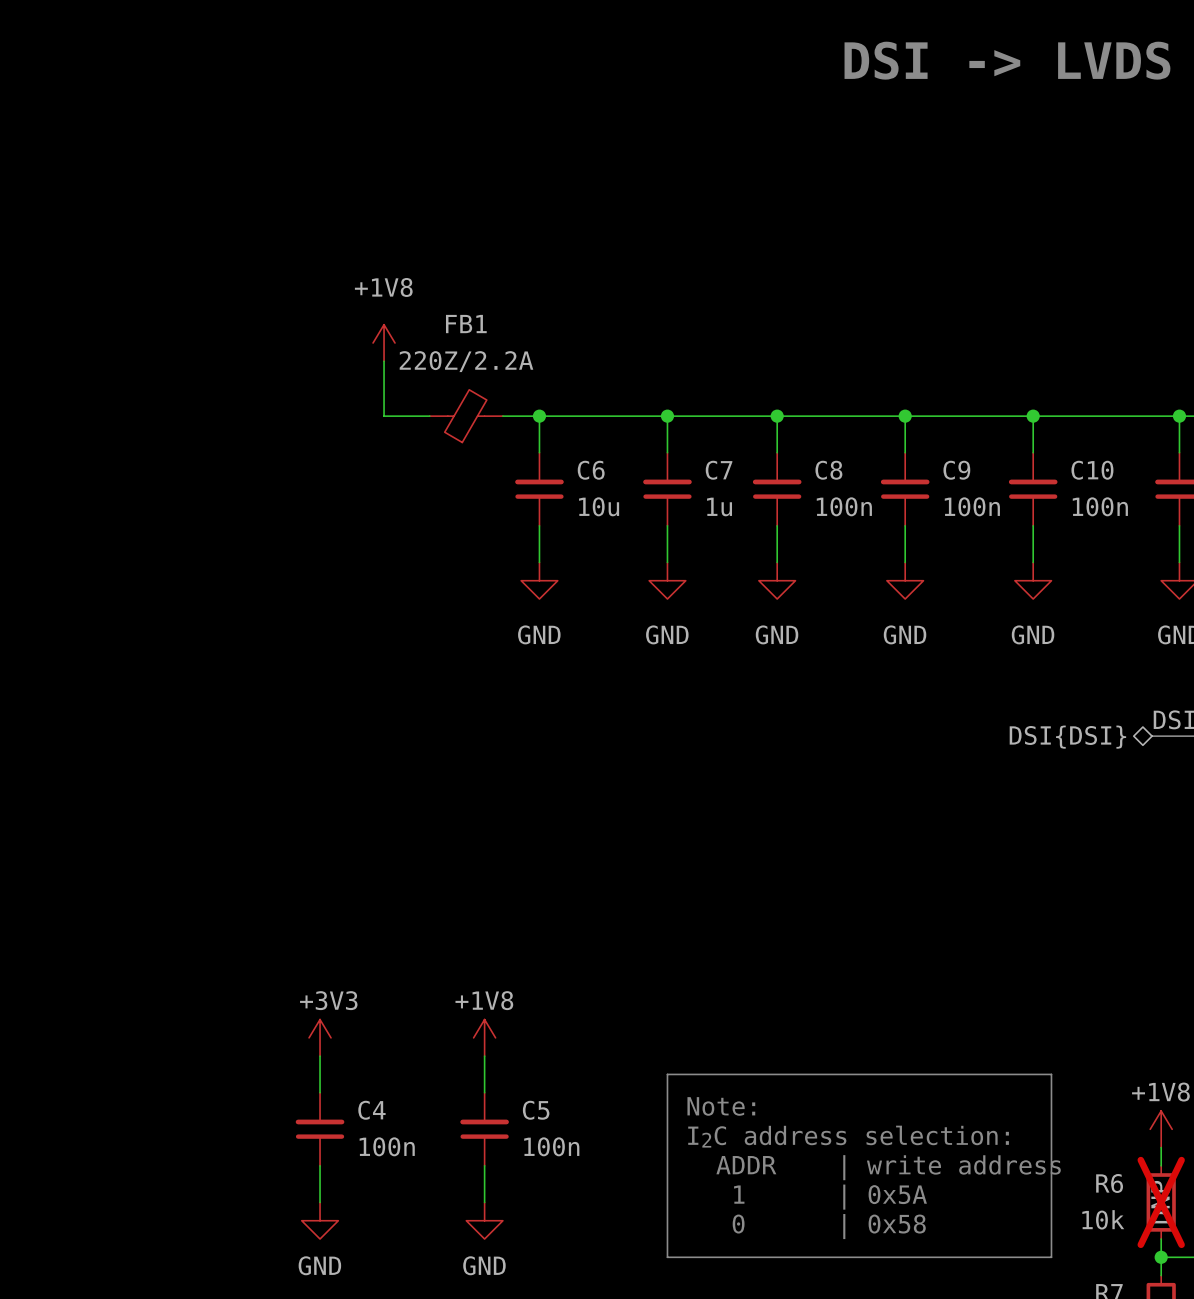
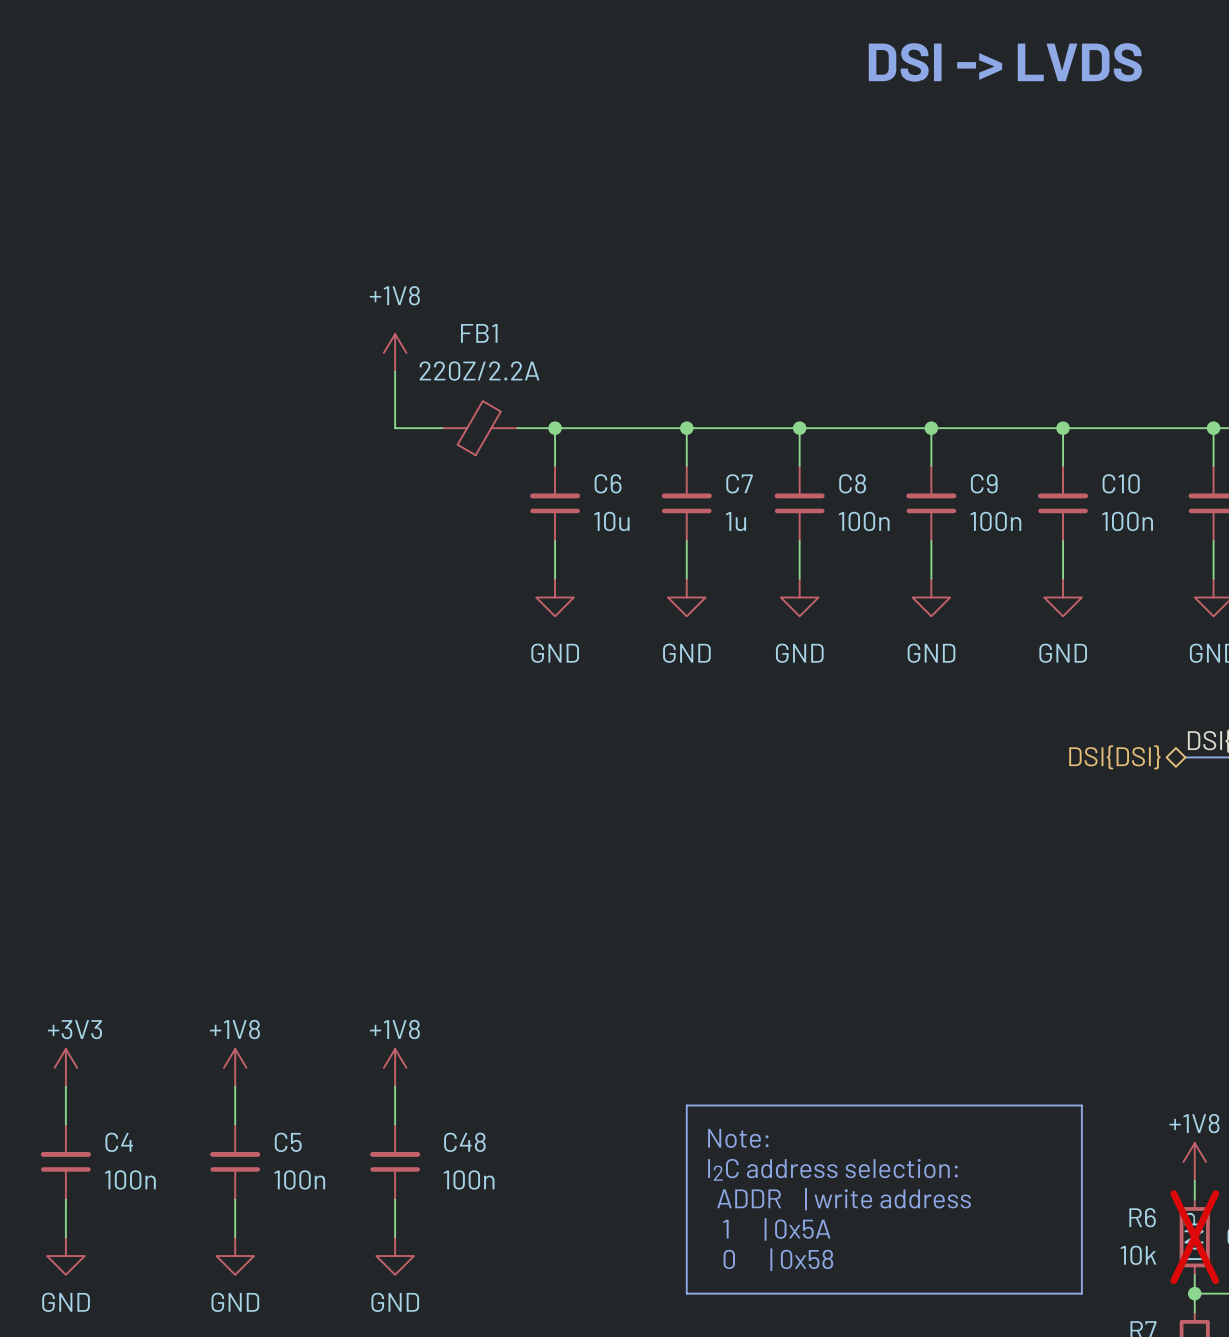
power symbol: none -> +3V3 (65, 1067)
power symbol: none -> +1V8 (235, 1067)
power symbol: +3V3 (320, 1037) -> none
power symbol position: +1V8 (484, 1037) -> +1V8 (395, 1067)
wire: (320, 1056) (320, 1092) -> (65, 1086) (65, 1124)
wire: none -> (395, 1086) (395, 1124)
wire: (484, 1056) (484, 1092) -> (235, 1086) (235, 1124)
C4 position: (320, 1129) -> (65, 1161)
C48: none -> (395, 1161)
C5 position: (484, 1129) -> (235, 1161)
wire: (320, 1165) (320, 1202) -> (65, 1199) (65, 1237)
wire: none -> (395, 1199) (395, 1237)
wire: (484, 1165) (484, 1202) -> (235, 1199) (235, 1237)
power symbol: none -> GND (65, 1256)
power symbol: none -> GND (235, 1256)
power symbol: GND (320, 1220) -> none
power symbol: none -> GND (395, 1256)
power symbol: GND (484, 1220) -> none

